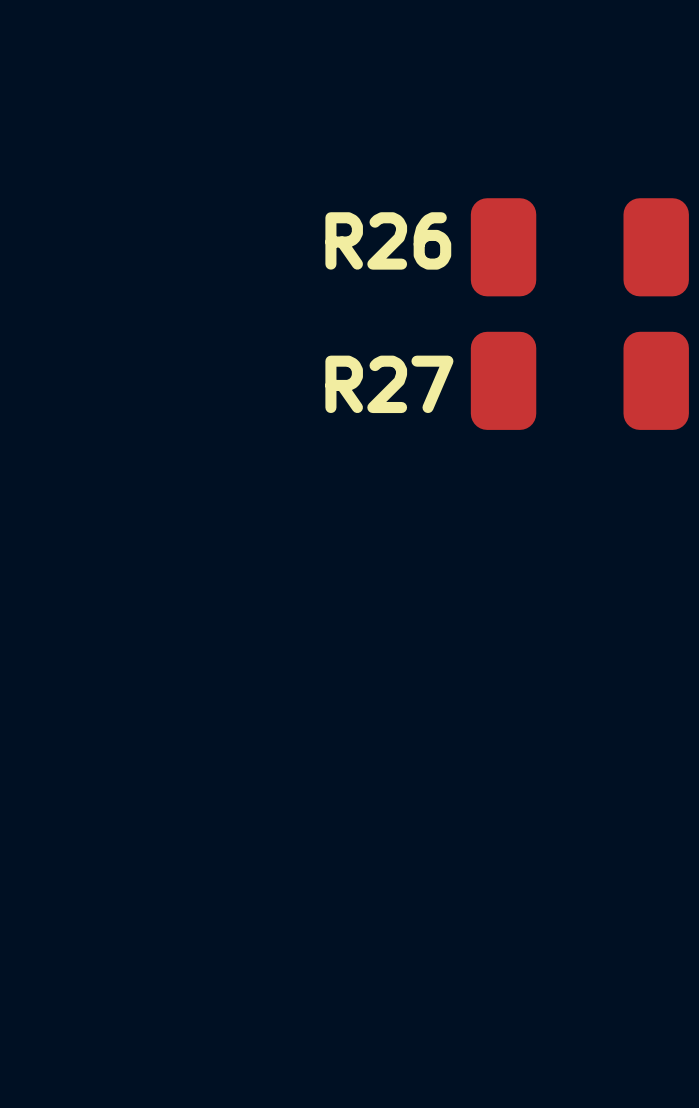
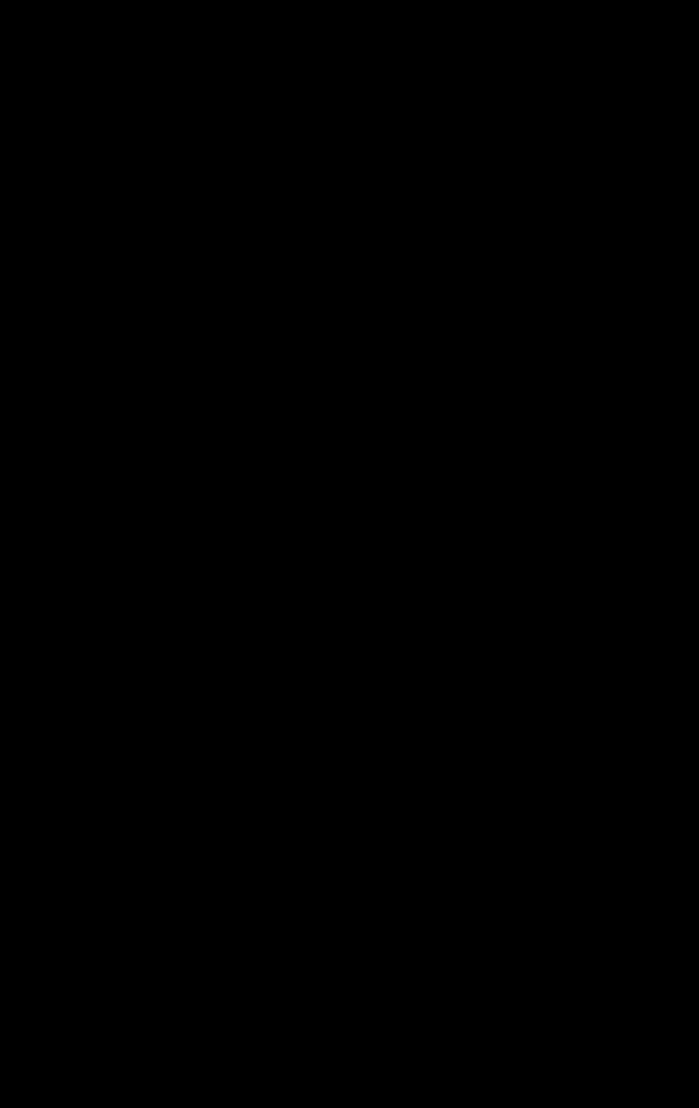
R26: (579, 247) -> none
R27: (579, 380) -> none

